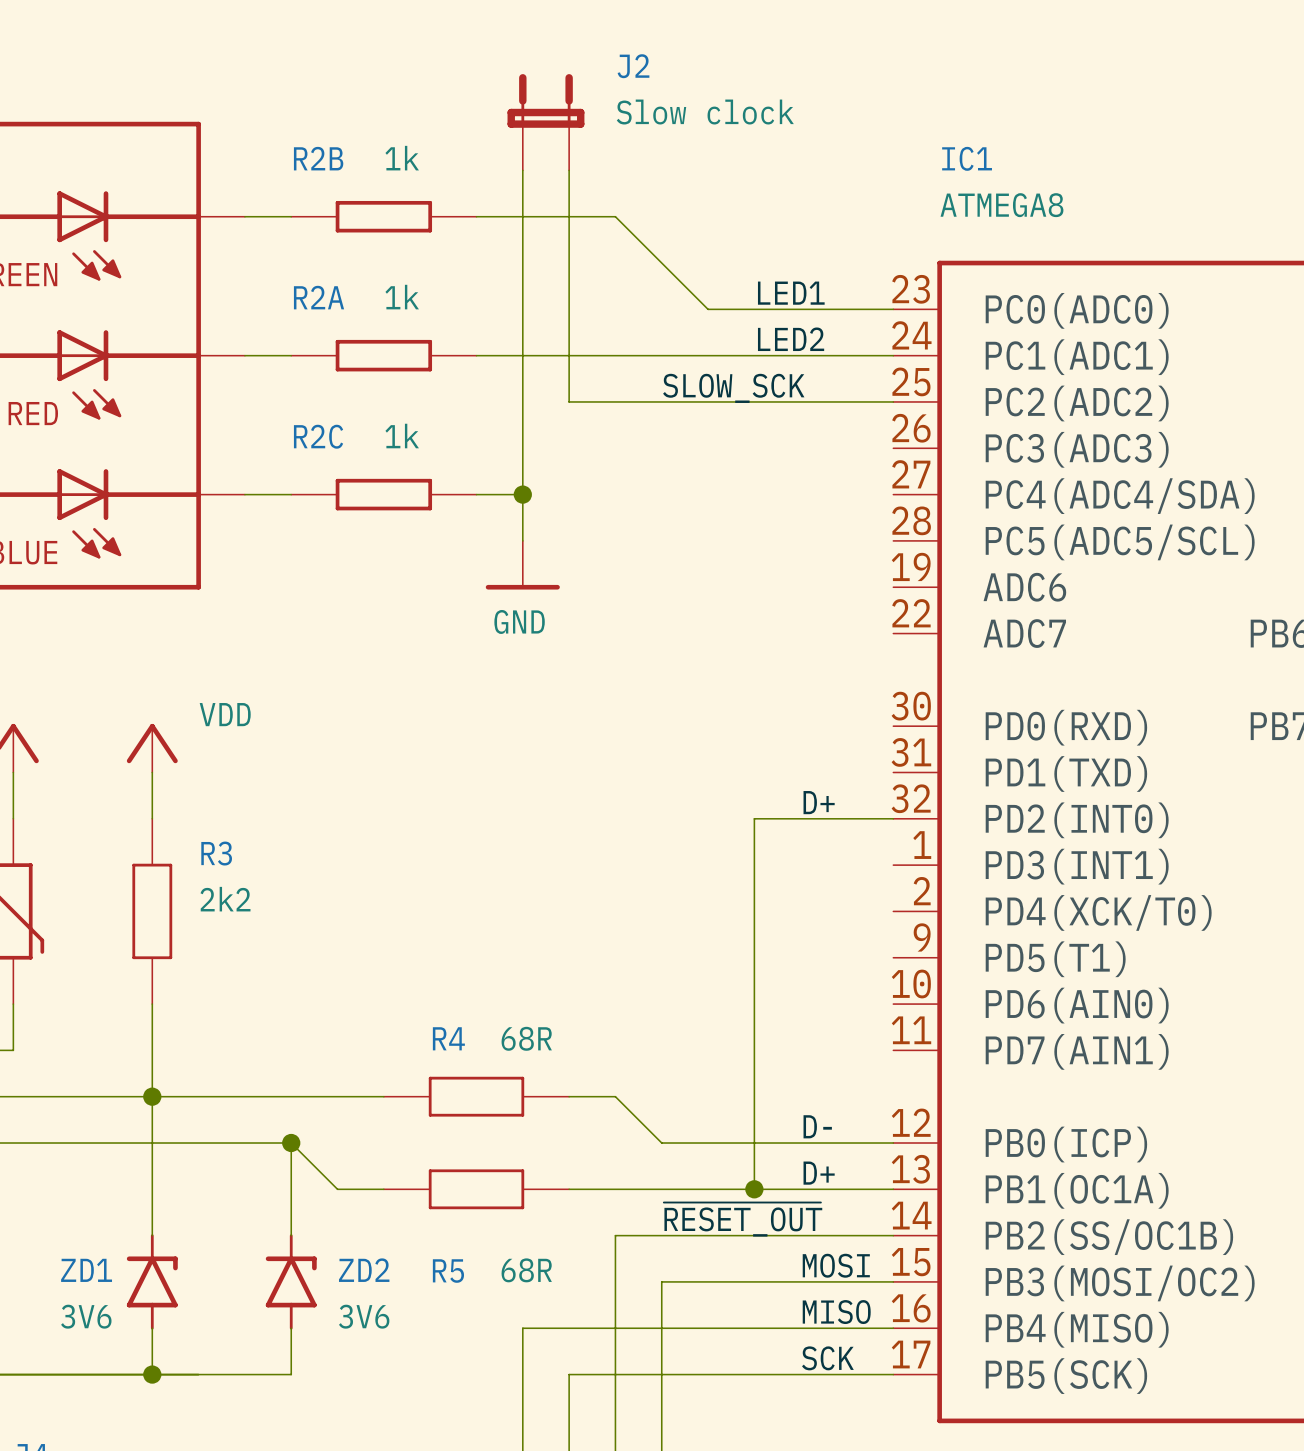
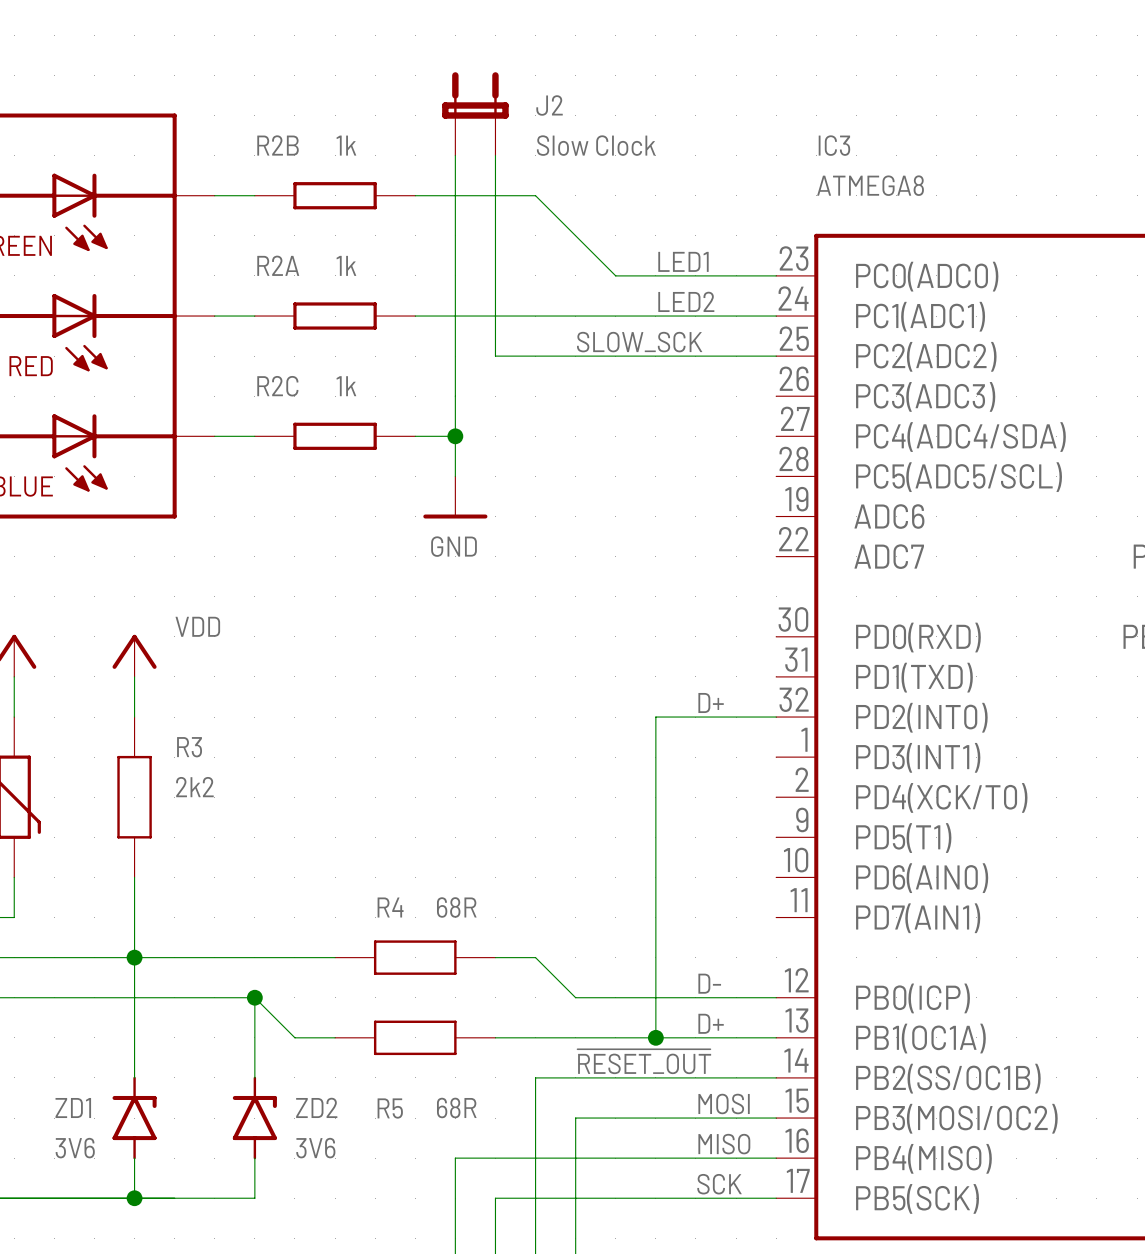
J2 name position: J2 (633, 66) -> J2 (549, 105)
J2 value: Slow clock (705, 112) -> Slow Clock (596, 145)
IC1 name: IC1 (967, 158) -> IC3 (834, 145)

